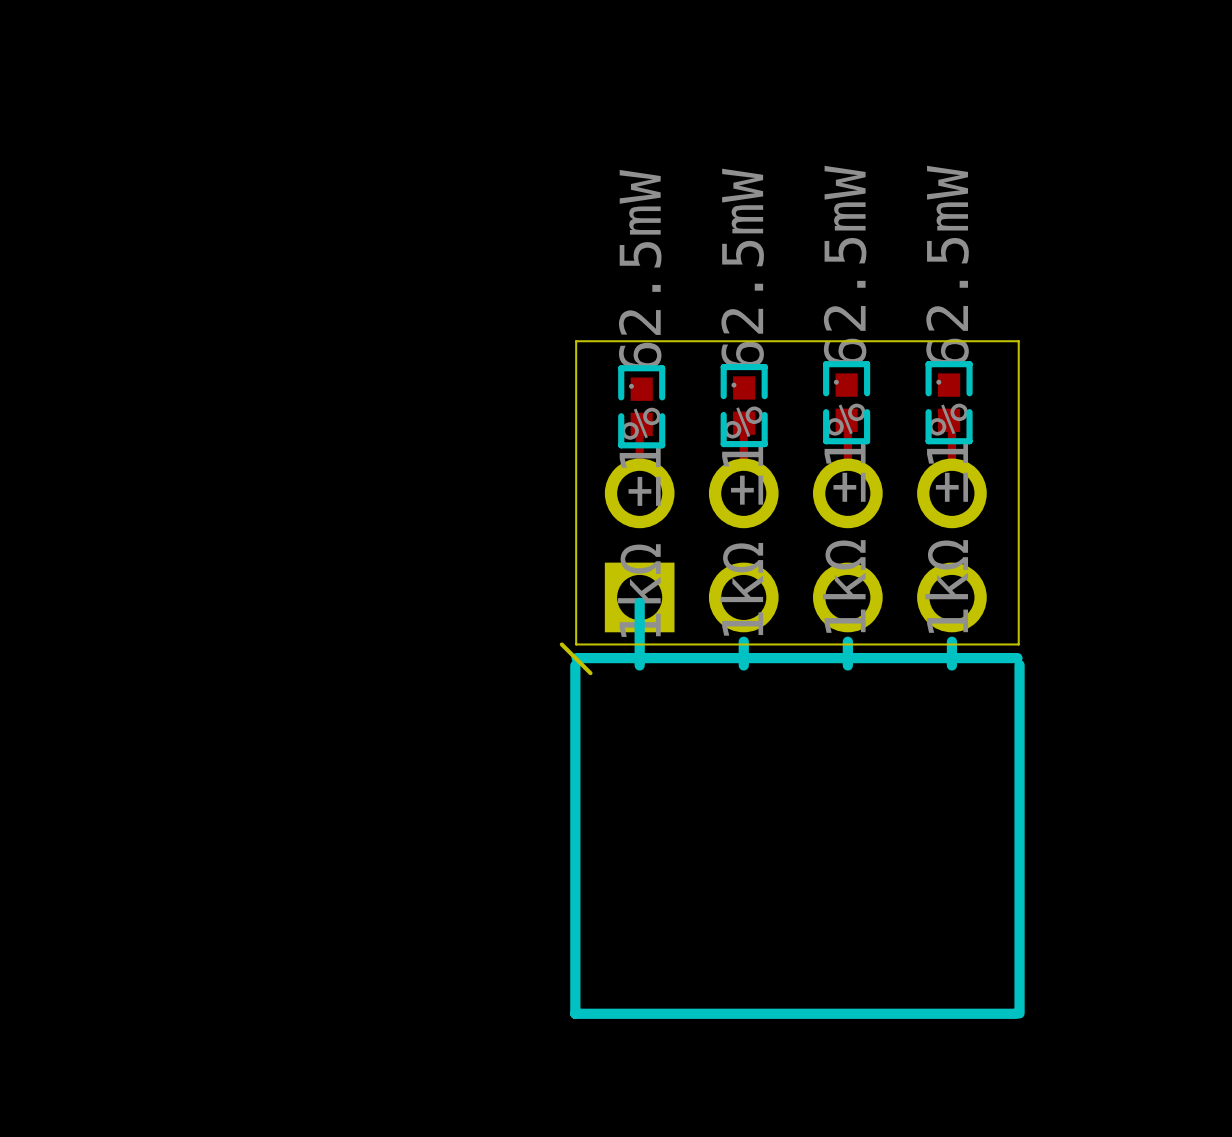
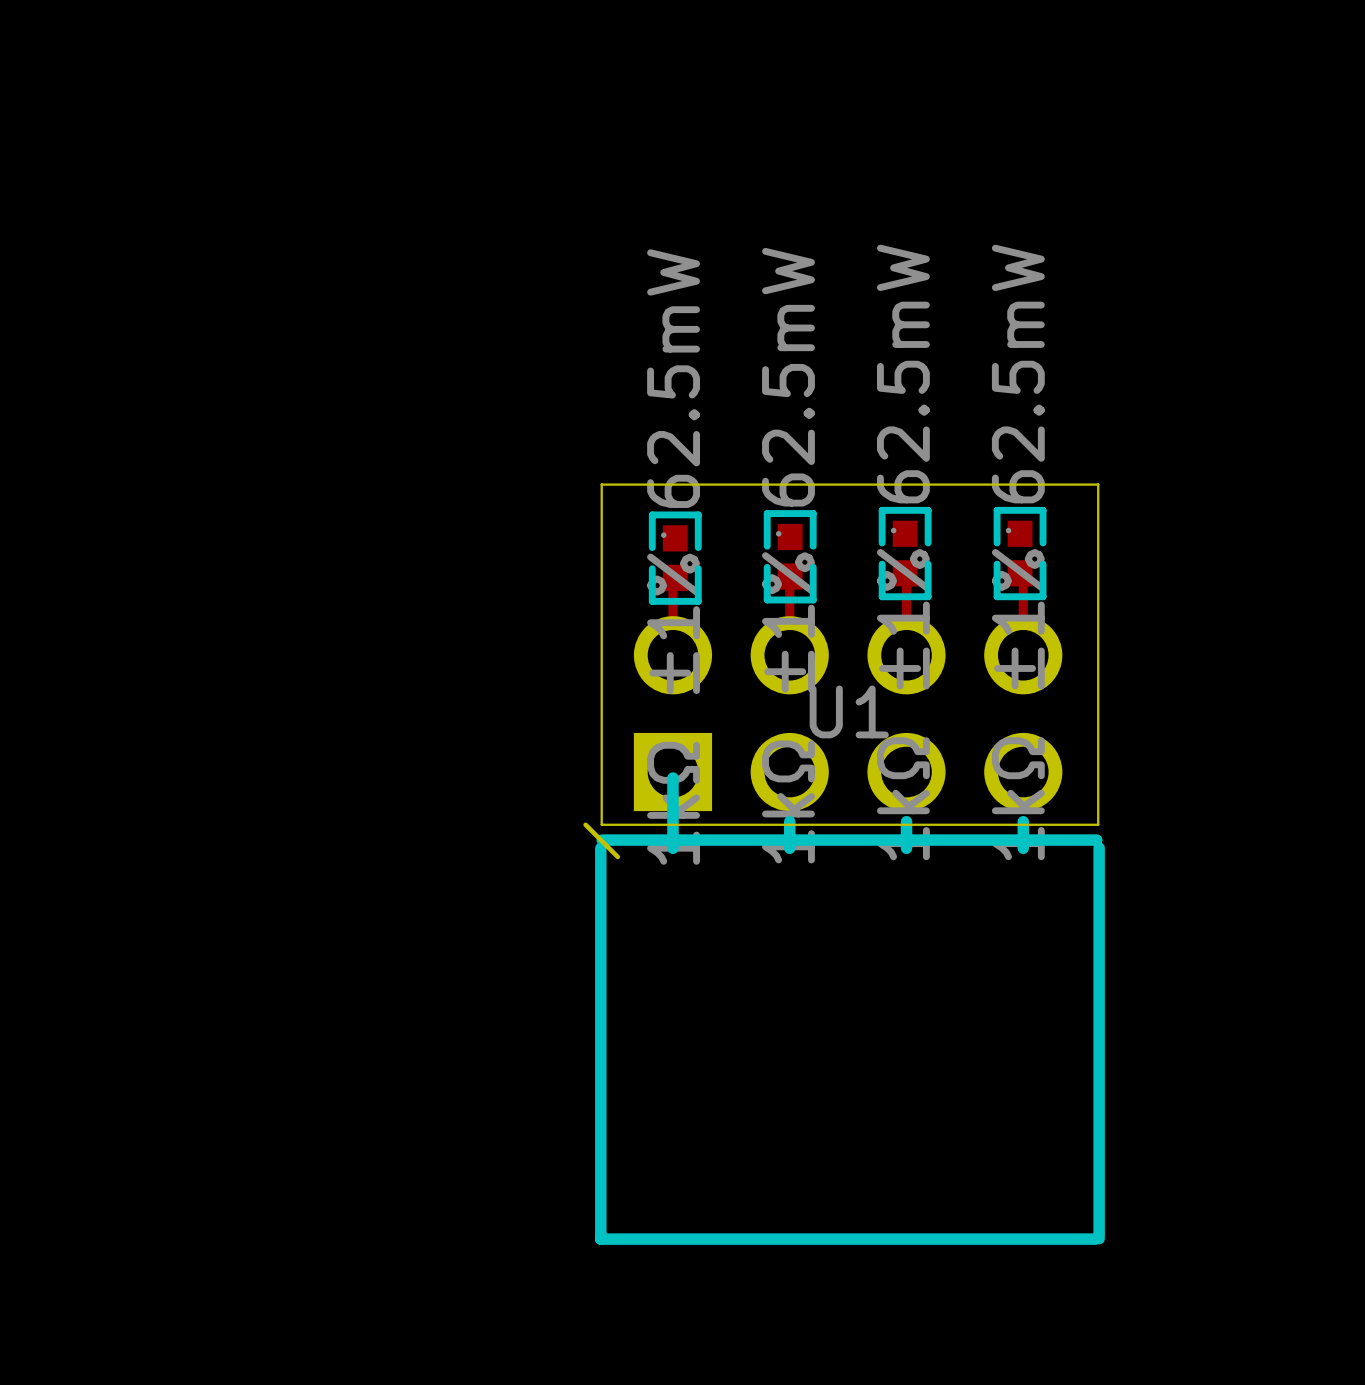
U1 name: none -> U1 (849, 711)

